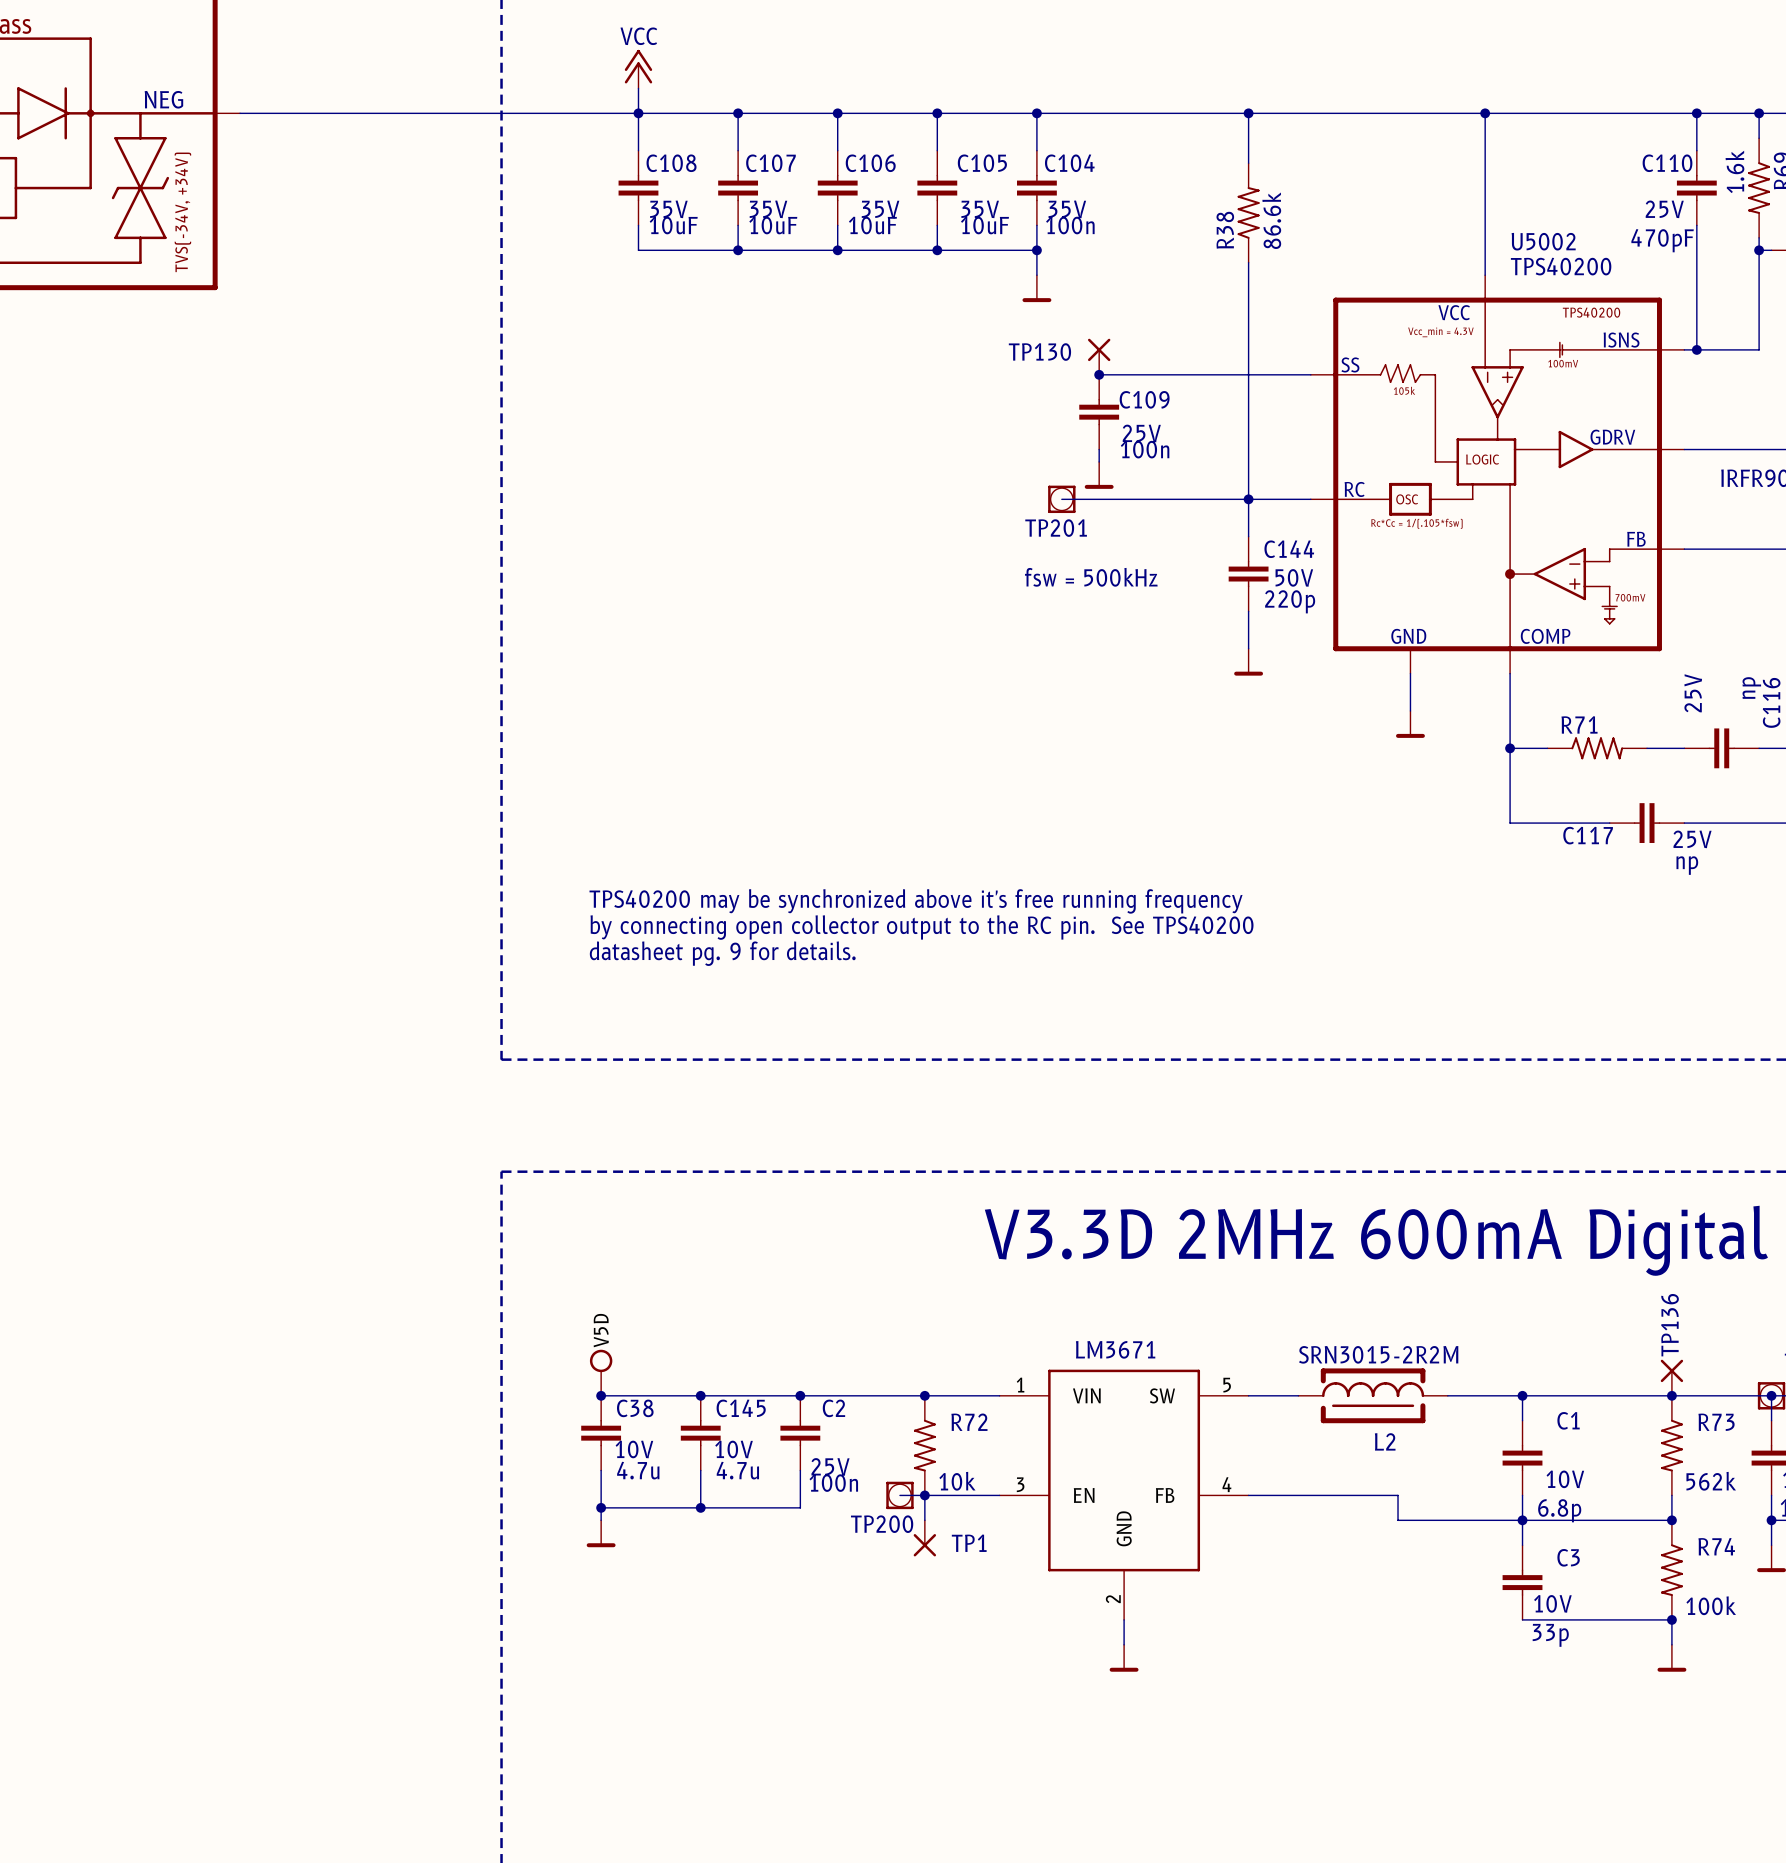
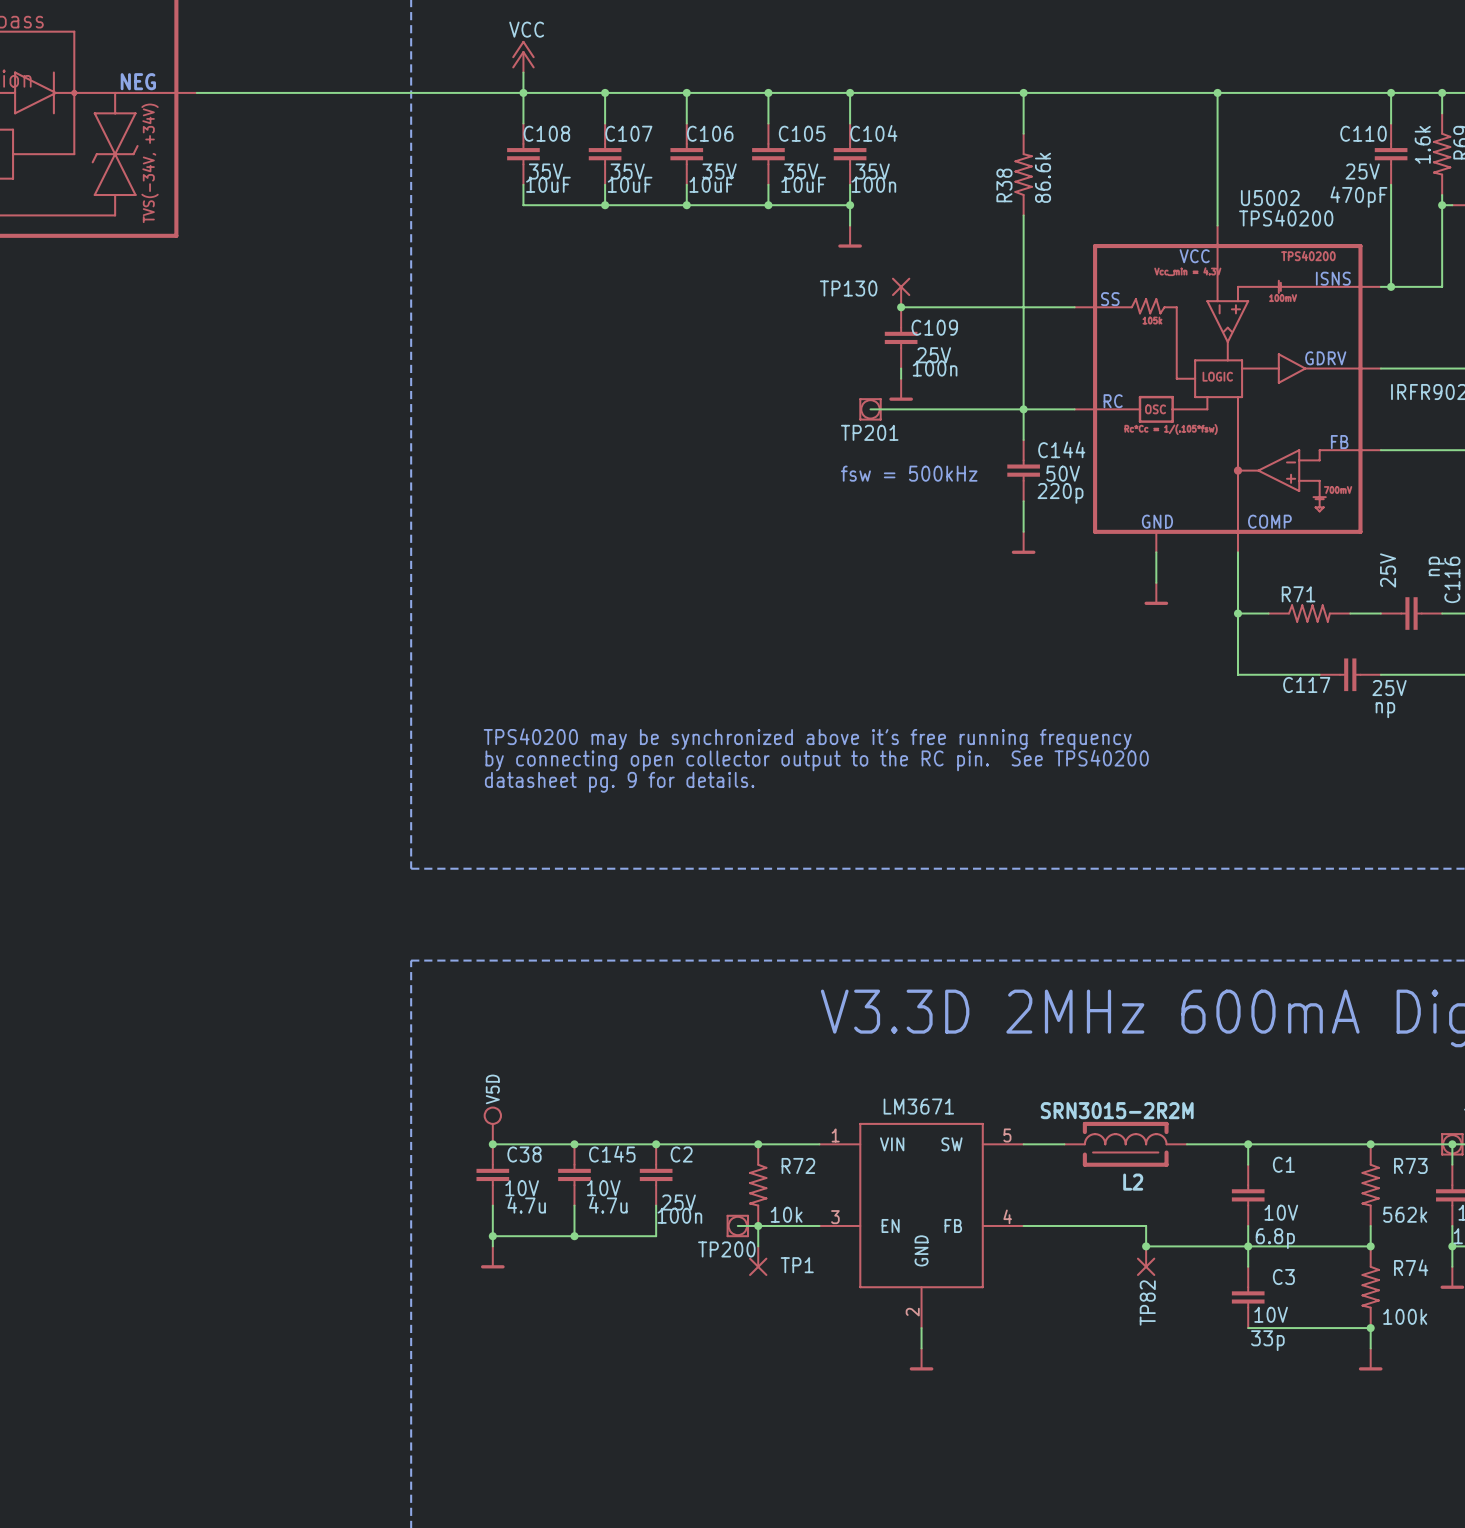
TP136: (1671, 1377) -> none
junction: none -> (1146, 1246)
TP82: none -> (1146, 1261)

